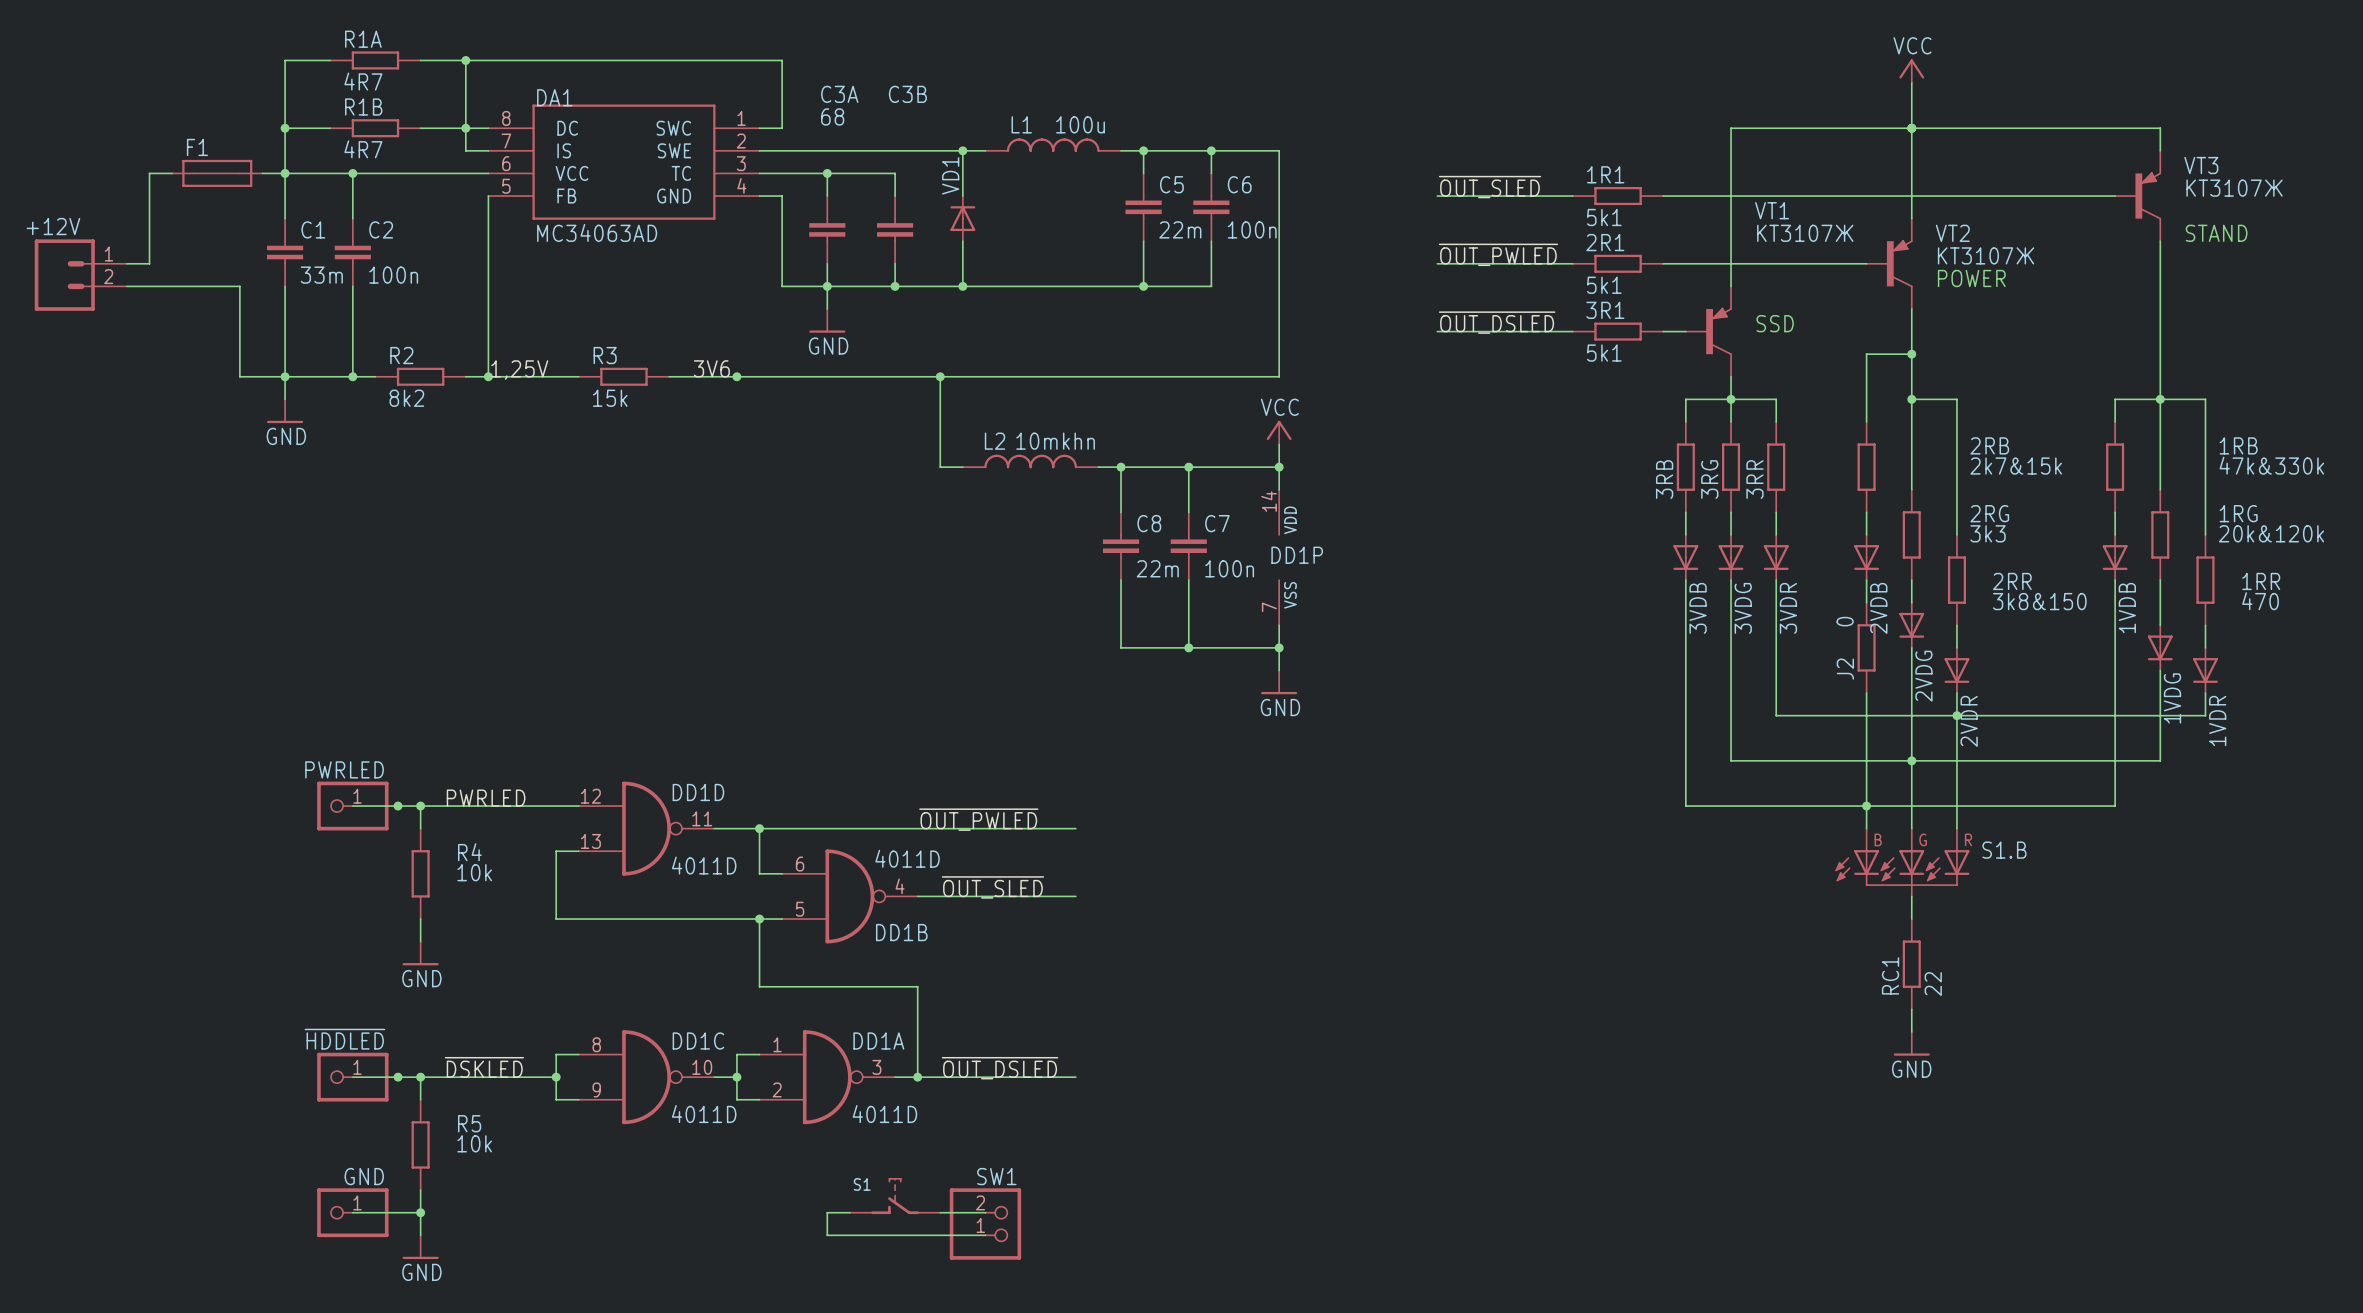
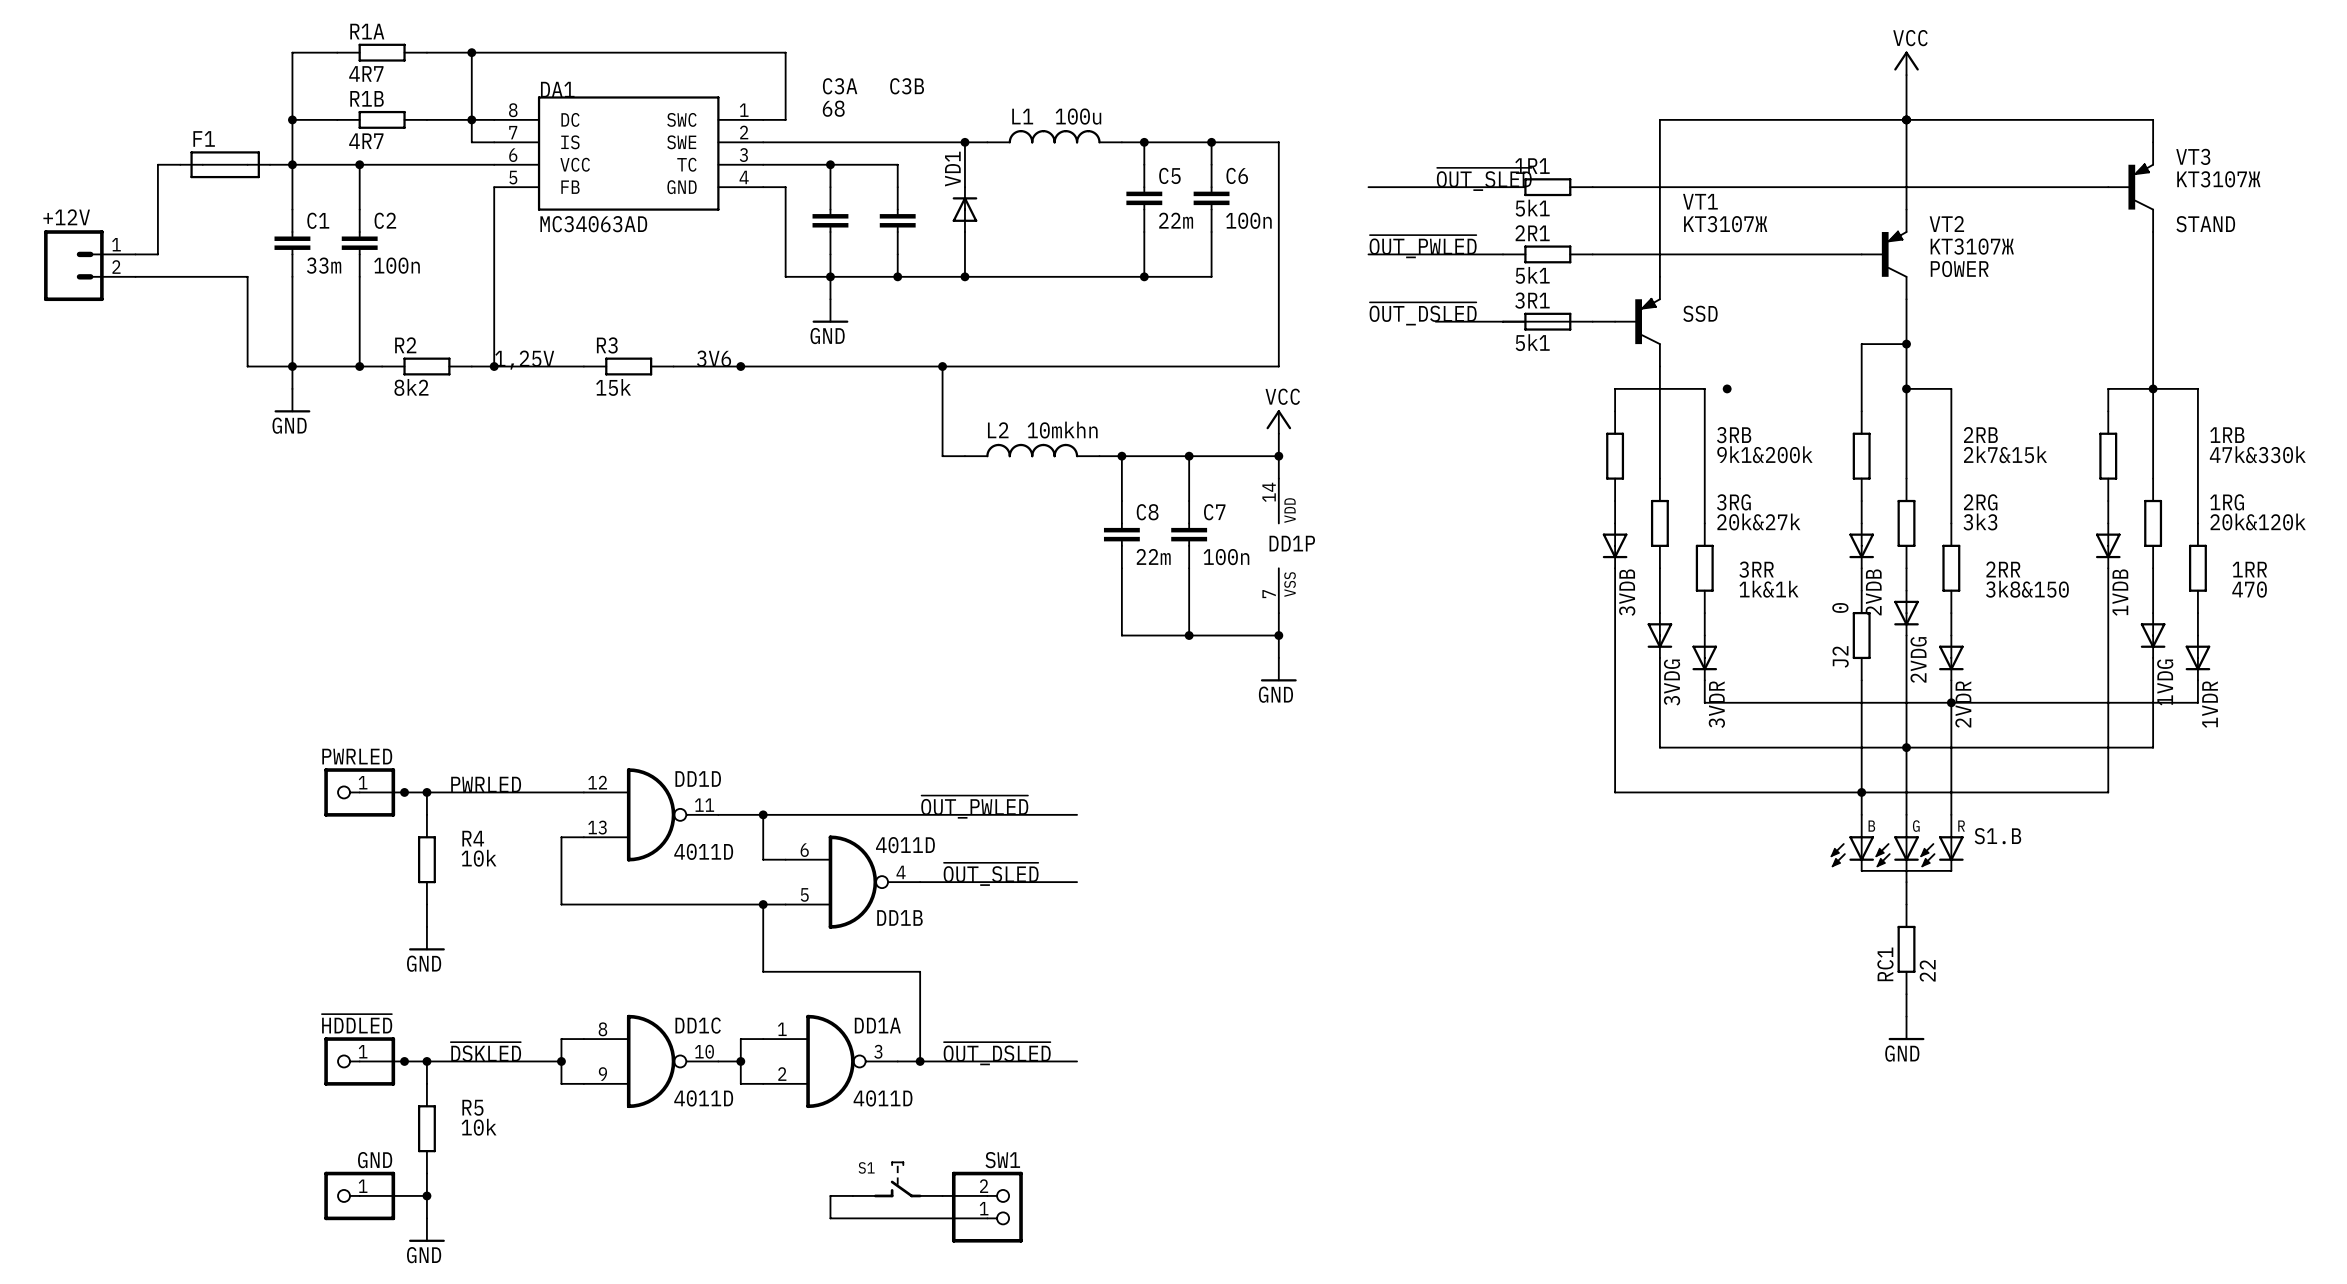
wire: (1731, 128) (1731, 286) -> (1727, 119) (1659, 119) (1659, 276)
wire: none -> (1368, 187) (1435, 187)
wire: (1505, 196) (1572, 196) -> (1592, 187) (1659, 187)
1R1 position: (1618, 196) -> (1547, 187)
label position: ~{OUT_PWLED} (1498, 254) -> ~{OUT_PWLED} (1423, 246)
wire: none -> (1368, 254) (1435, 254)
wire: (1505, 263) (1572, 263) -> (1592, 254) (1659, 254)
2R1 position: (1618, 263) -> (1547, 254)
label position: ~{OUT_DSLED} (1497, 322) -> ~{OUT_DSLED} (1423, 313)
text position: SSD (1775, 323) -> SSD (1700, 313)
3R1 position: (1618, 331) -> (1547, 321)
wire: (1663, 331) (1685, 331) -> (1592, 321) (1615, 321)
VT1 position: (1708, 331) -> (1637, 321)
wire: none -> (1659, 366) (1659, 478)
wire: (1731, 376) (1731, 421) -> (1659, 568) (1659, 613)
wire: (1685, 399) (1685, 421) -> (1682, 388) (1615, 388) (1615, 411)
wire: (1708, 399) (1776, 399) (1776, 421) -> (1704, 388) (1704, 523)
3RB value: none -> 9k1&200k (1764, 454)
3RB position: (1685, 467) -> (1615, 456)
3RG position: (1731, 467) -> (1659, 523)
3RR position: (1776, 467) -> (1704, 568)
3RB name rotation: 0° (1664, 479) -> 90° clockwise (1734, 435)
3RB name position: 3RB (1664, 479) -> 3RB (1734, 435)
3RG name rotation: 0° (1709, 479) -> 90° clockwise (1733, 502)
3RG name position: 3RG (1709, 479) -> 3RG (1733, 502)
3RR name rotation: 0° (1754, 479) -> 90° clockwise (1756, 569)
3RR name position: 3RR (1754, 479) -> 3RR (1756, 569)
wire: (1685, 512) (1685, 534) -> (1615, 501) (1615, 523)
wire: (1731, 512) (1731, 534) -> none
wire: (1776, 512) (1776, 534) -> (1704, 613) (1704, 635)
3RG value: none -> 20k&27k (1758, 521)
3VDB position: (1685, 557) -> (1615, 545)
3VDG position: (1731, 557) -> (1659, 635)
3VDR position: (1776, 557) -> (1704, 657)
wire: (1685, 580) (1685, 806) -> (1615, 568) (1615, 792) (1682, 792)
wire: (1731, 580) (1731, 760) -> (1659, 657) (1659, 747) (1727, 747)
wire: (1776, 580) (1776, 715) -> (1704, 680) (1704, 702) (1772, 702)
3RR value: none -> 1k&1k (1769, 589)

